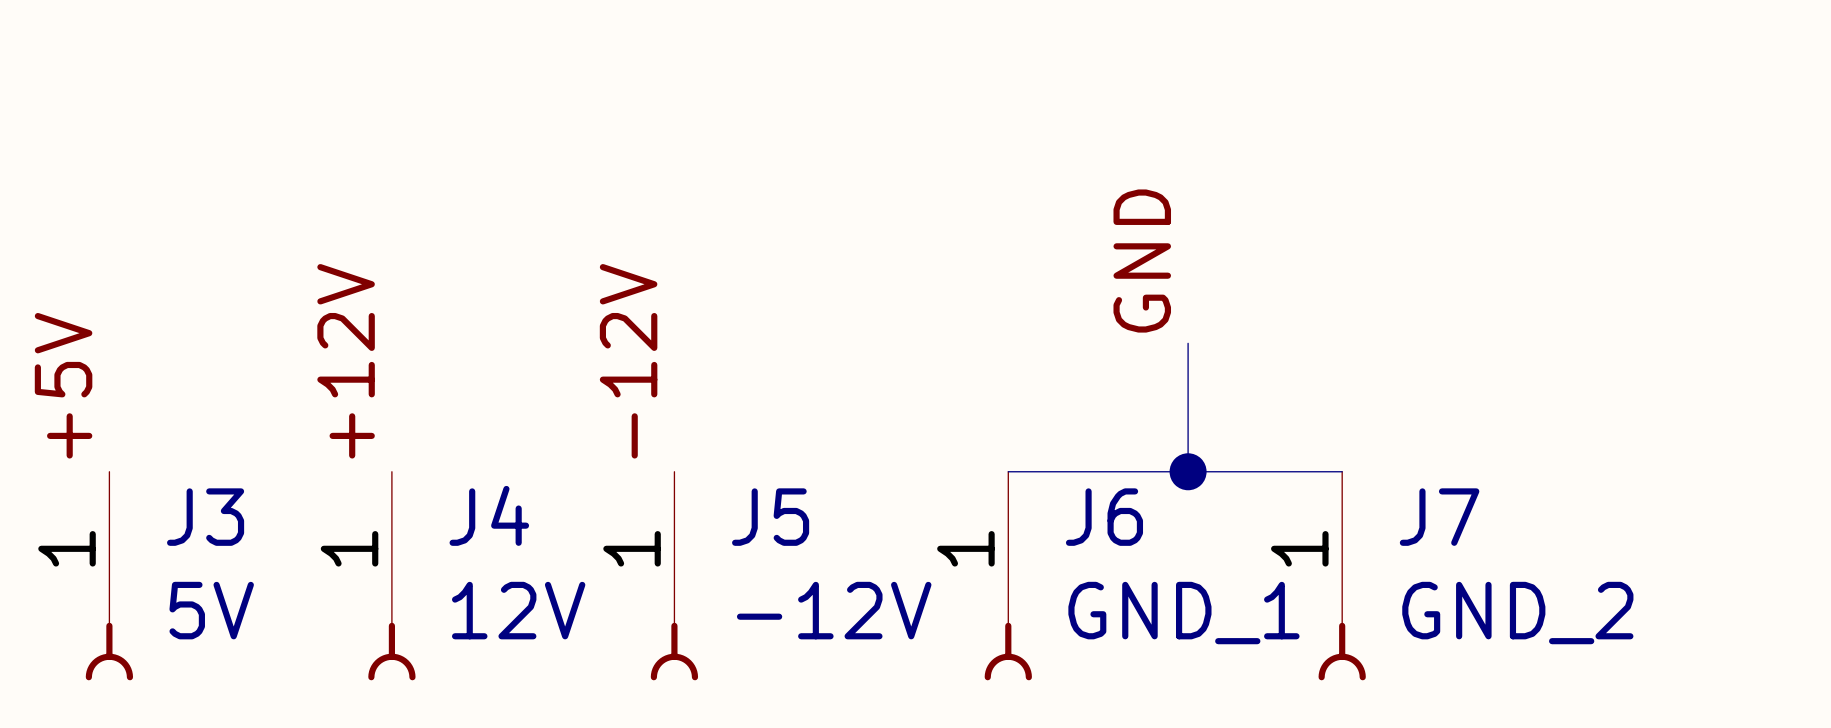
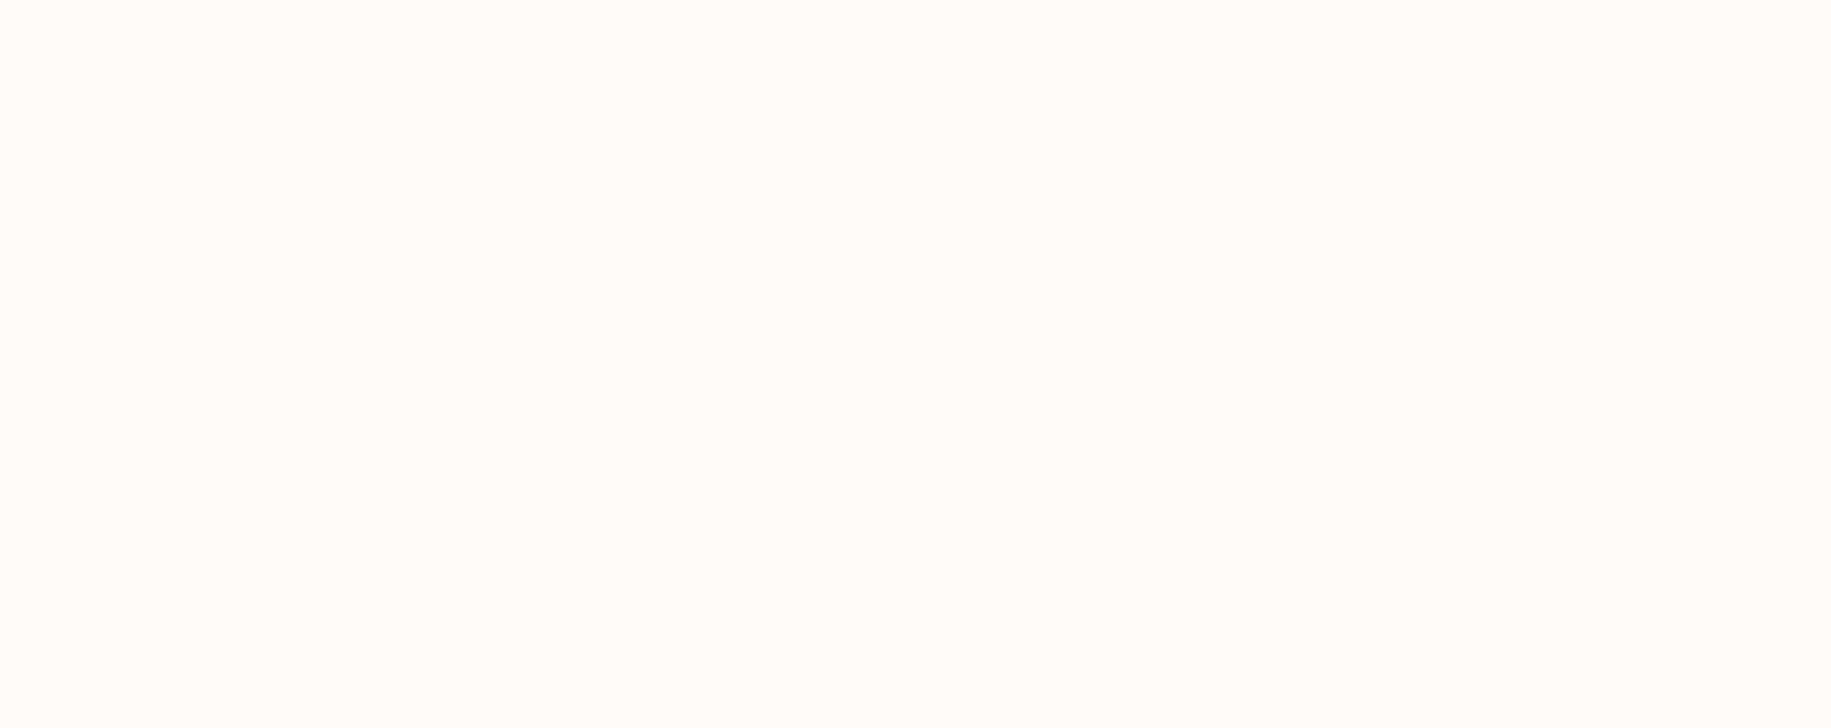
label: GND (1142, 261) -> none
wire: (1188, 343) (1188, 471) -> none
label: +12V (346, 361) -> none
label: -12V (628, 361) -> none
label: +5V (63, 385) -> none
wire: (1008, 471) (1342, 471) -> none
junction: (1188, 471) -> none
J3: 5V (109, 576) -> none
J4: 12V (391, 576) -> none
J5: -12V (674, 576) -> none
J6: GND_1 (1008, 576) -> none
J7: GND_2 (1342, 576) -> none

